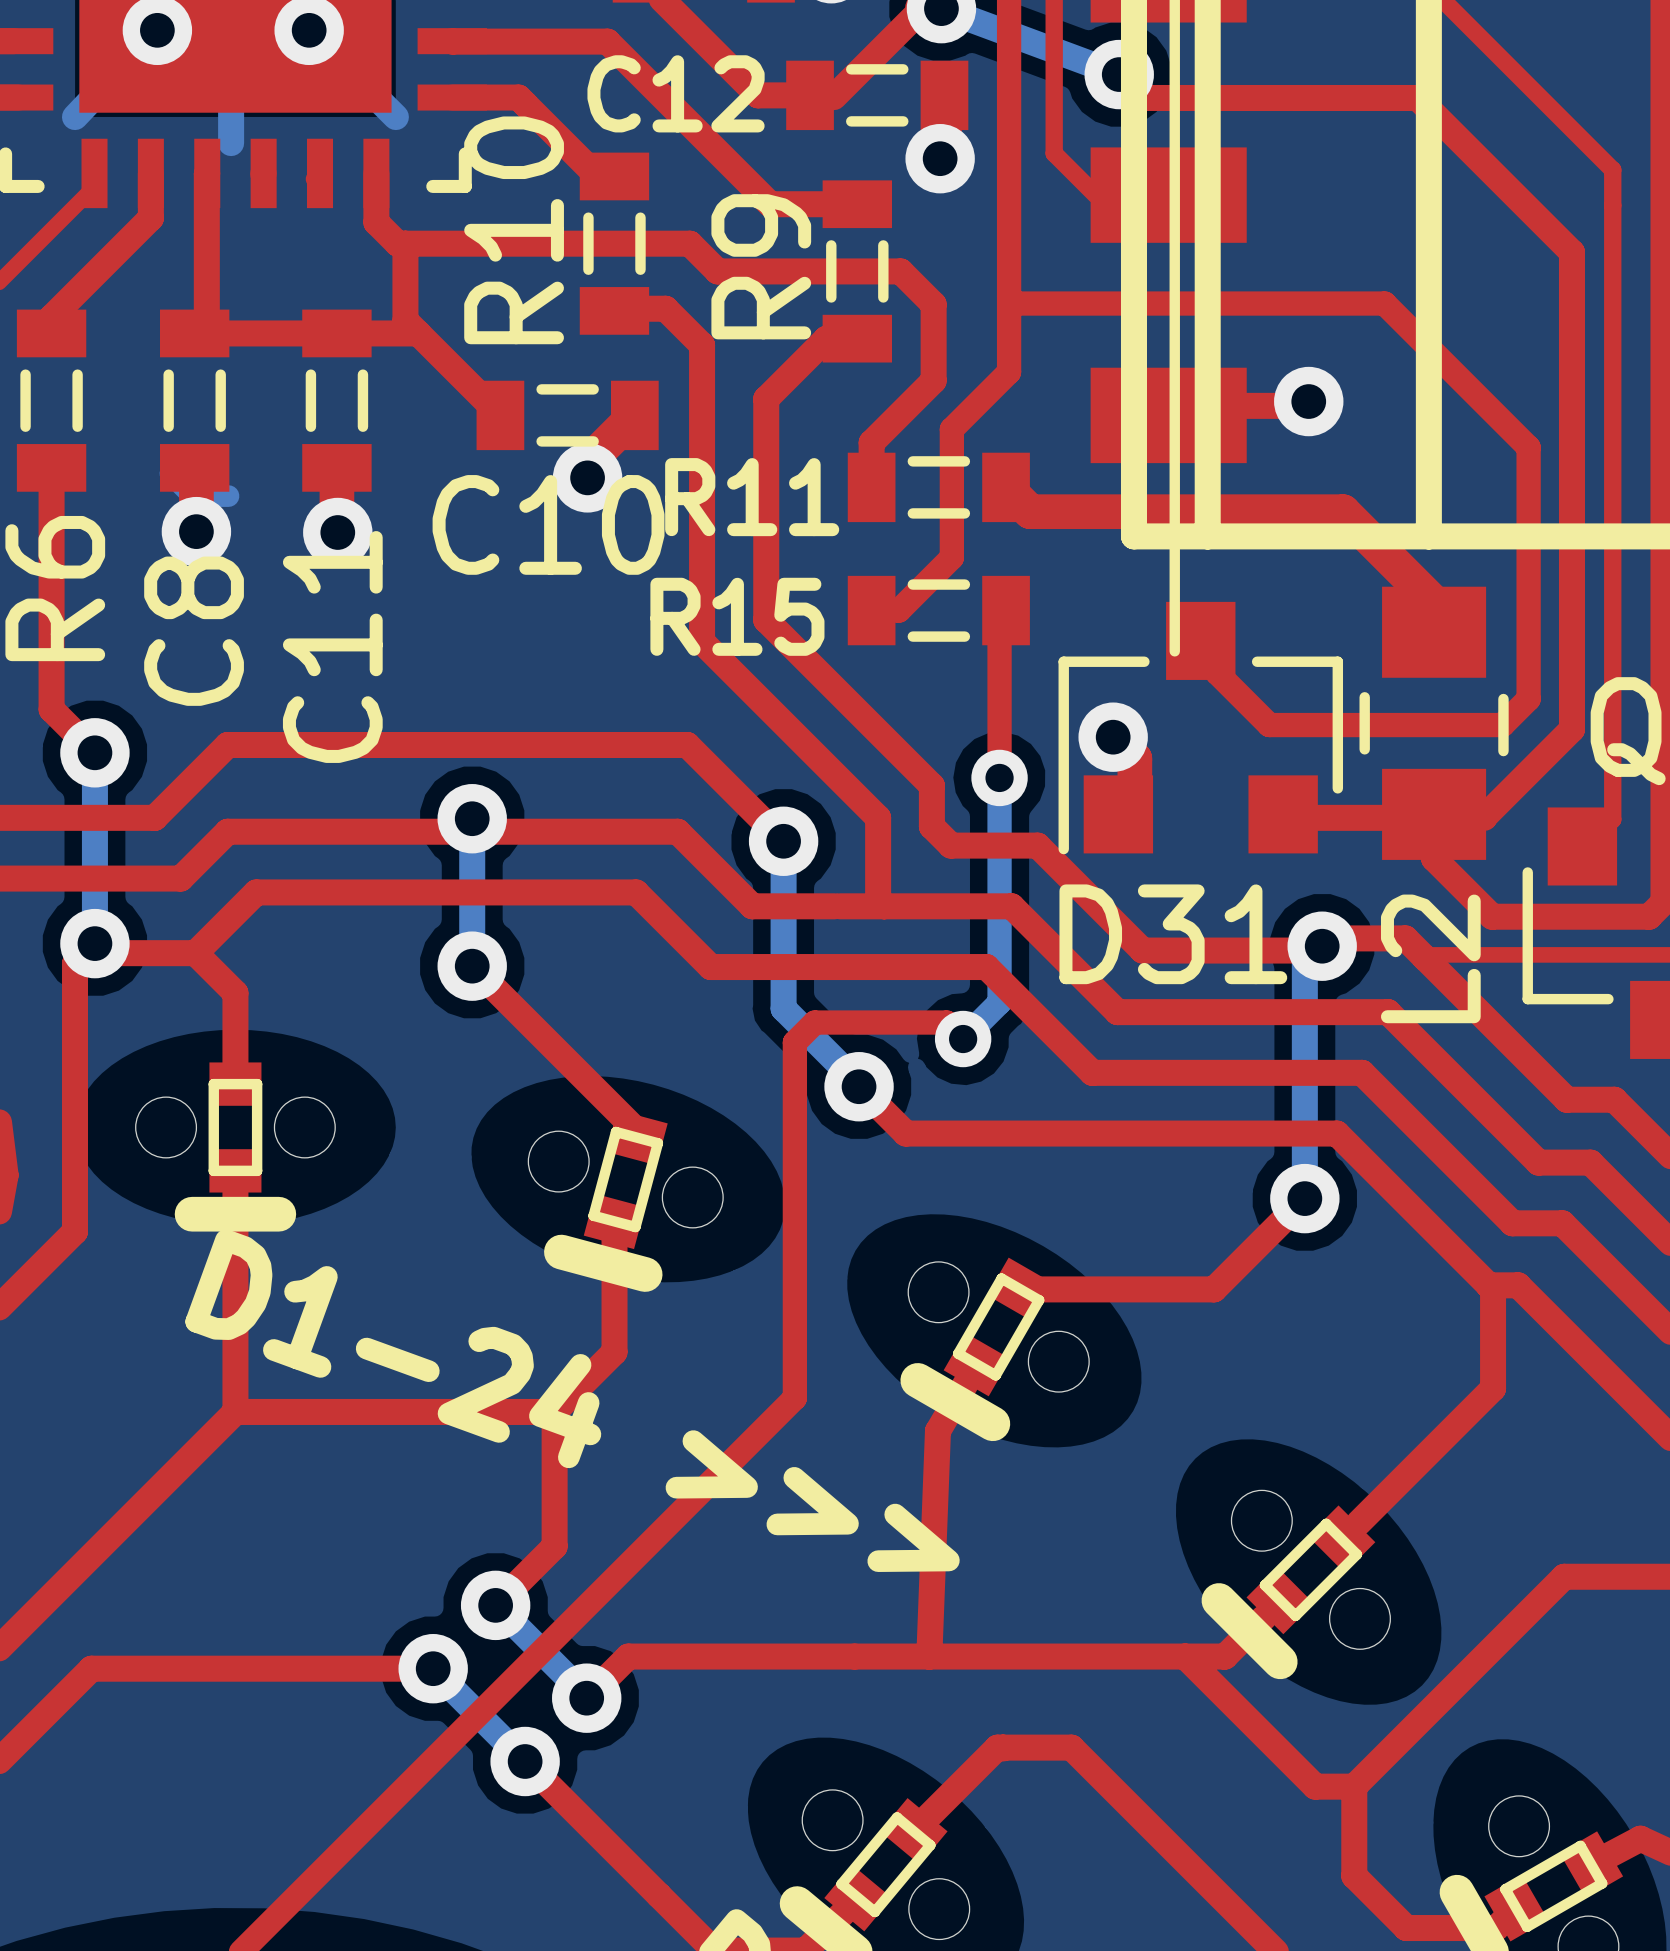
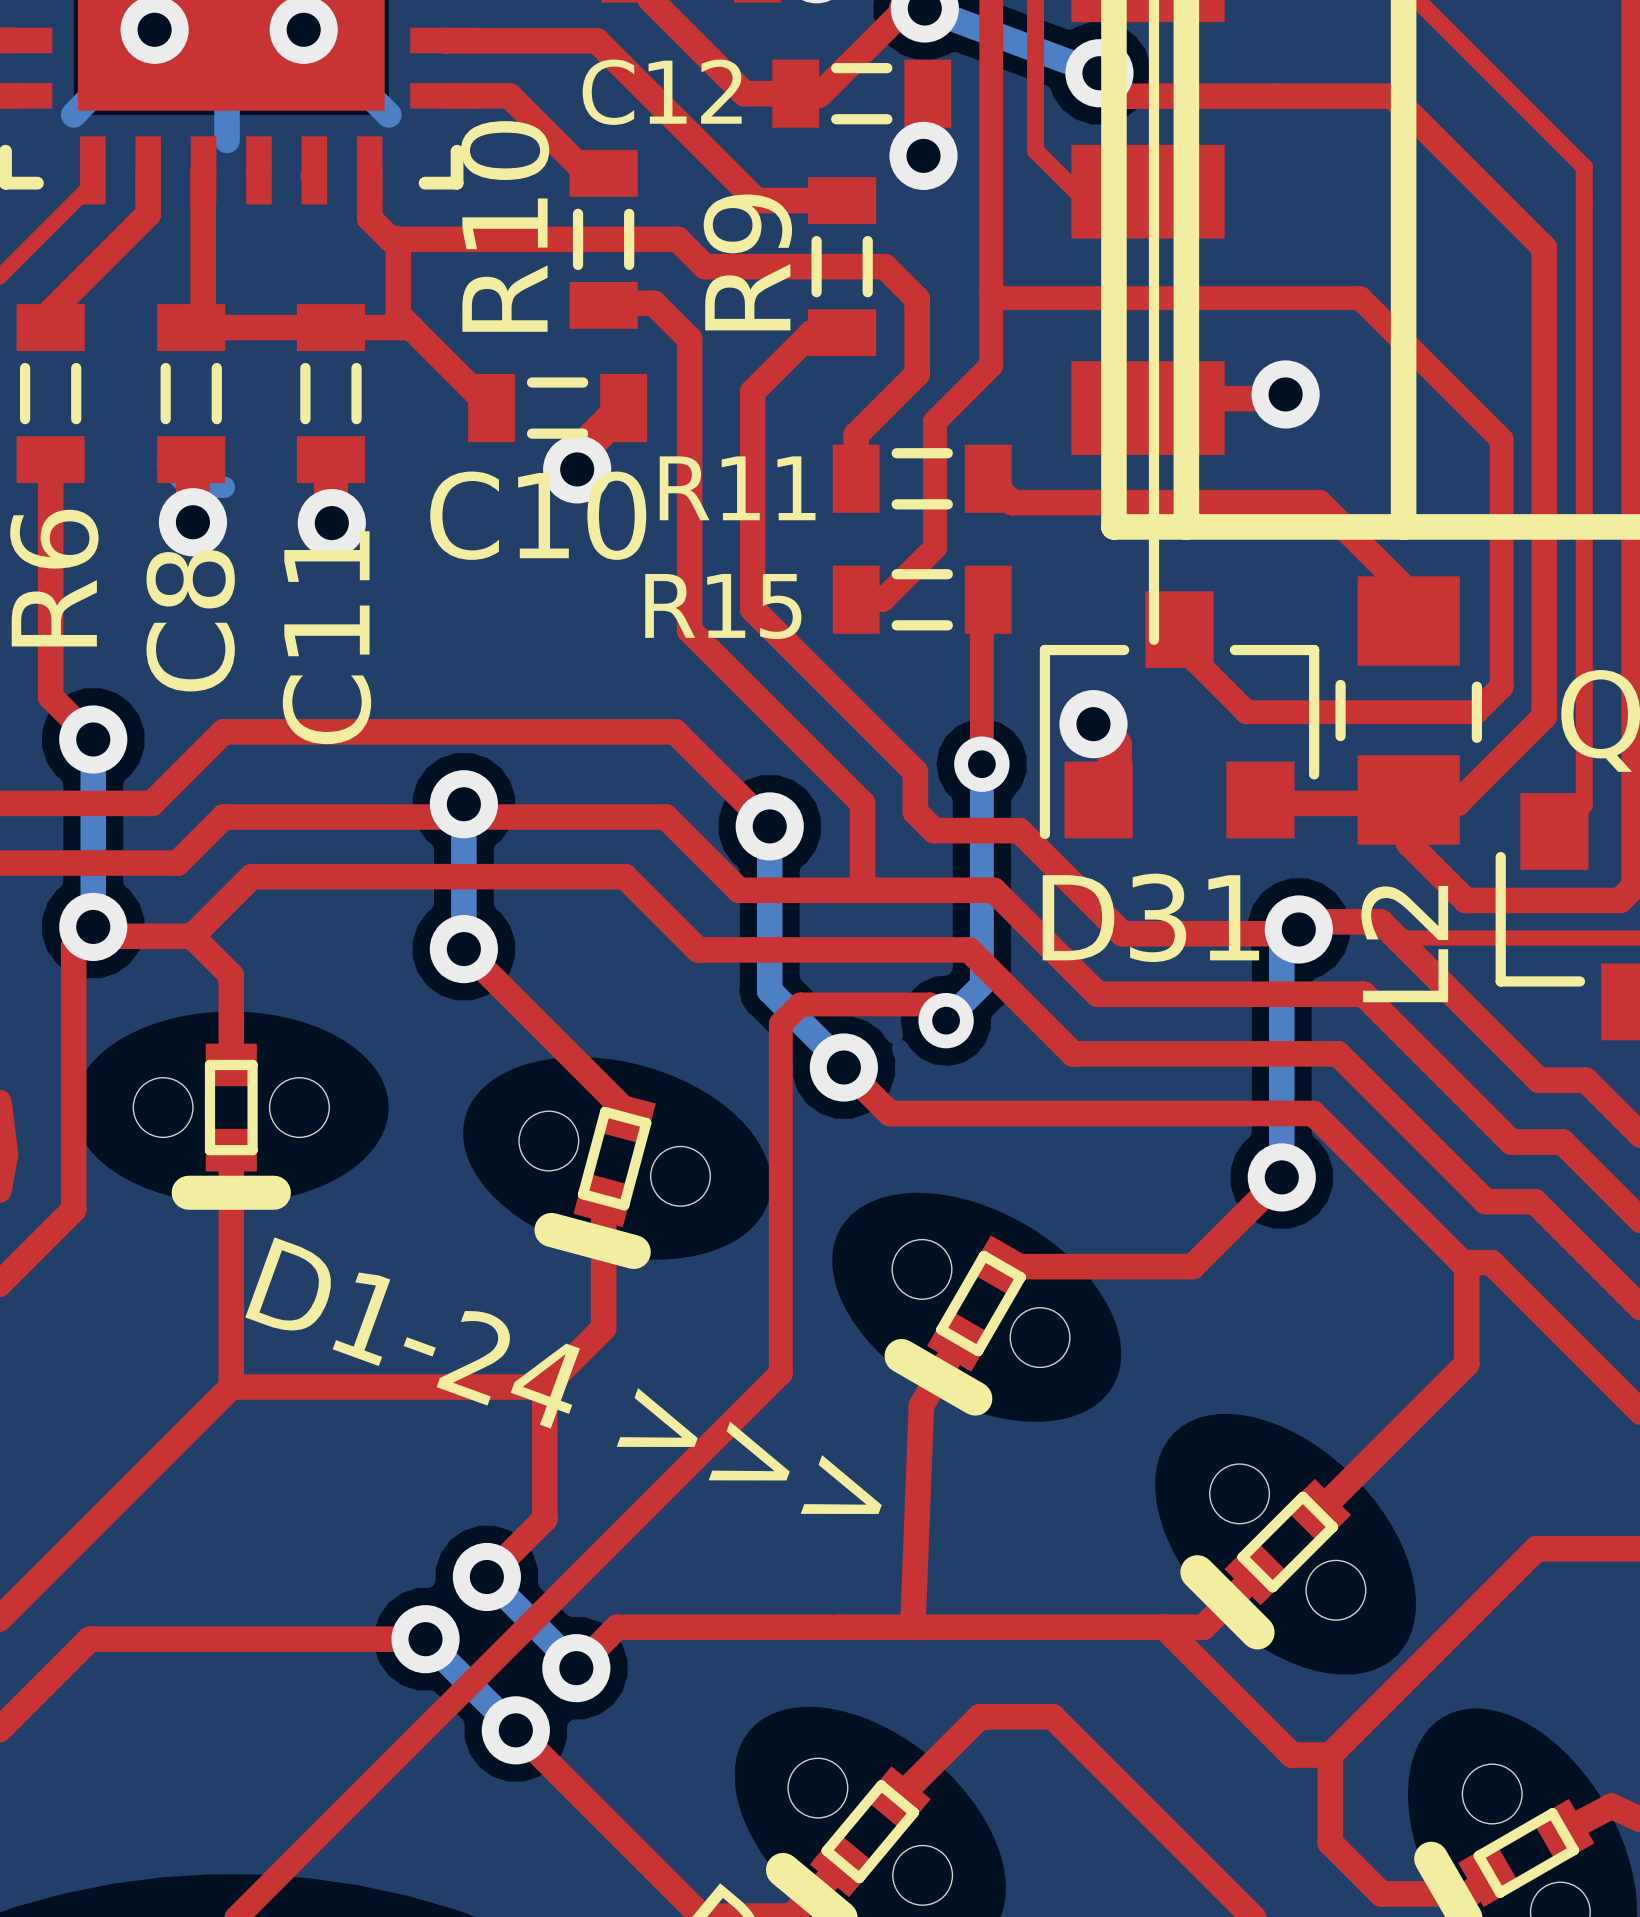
top track width: thick (1006, 487) (1030, 511) (1343, 511) (1449, 618) -> thin (988, 478) (1012, 502) (1319, 502) (1424, 607)

